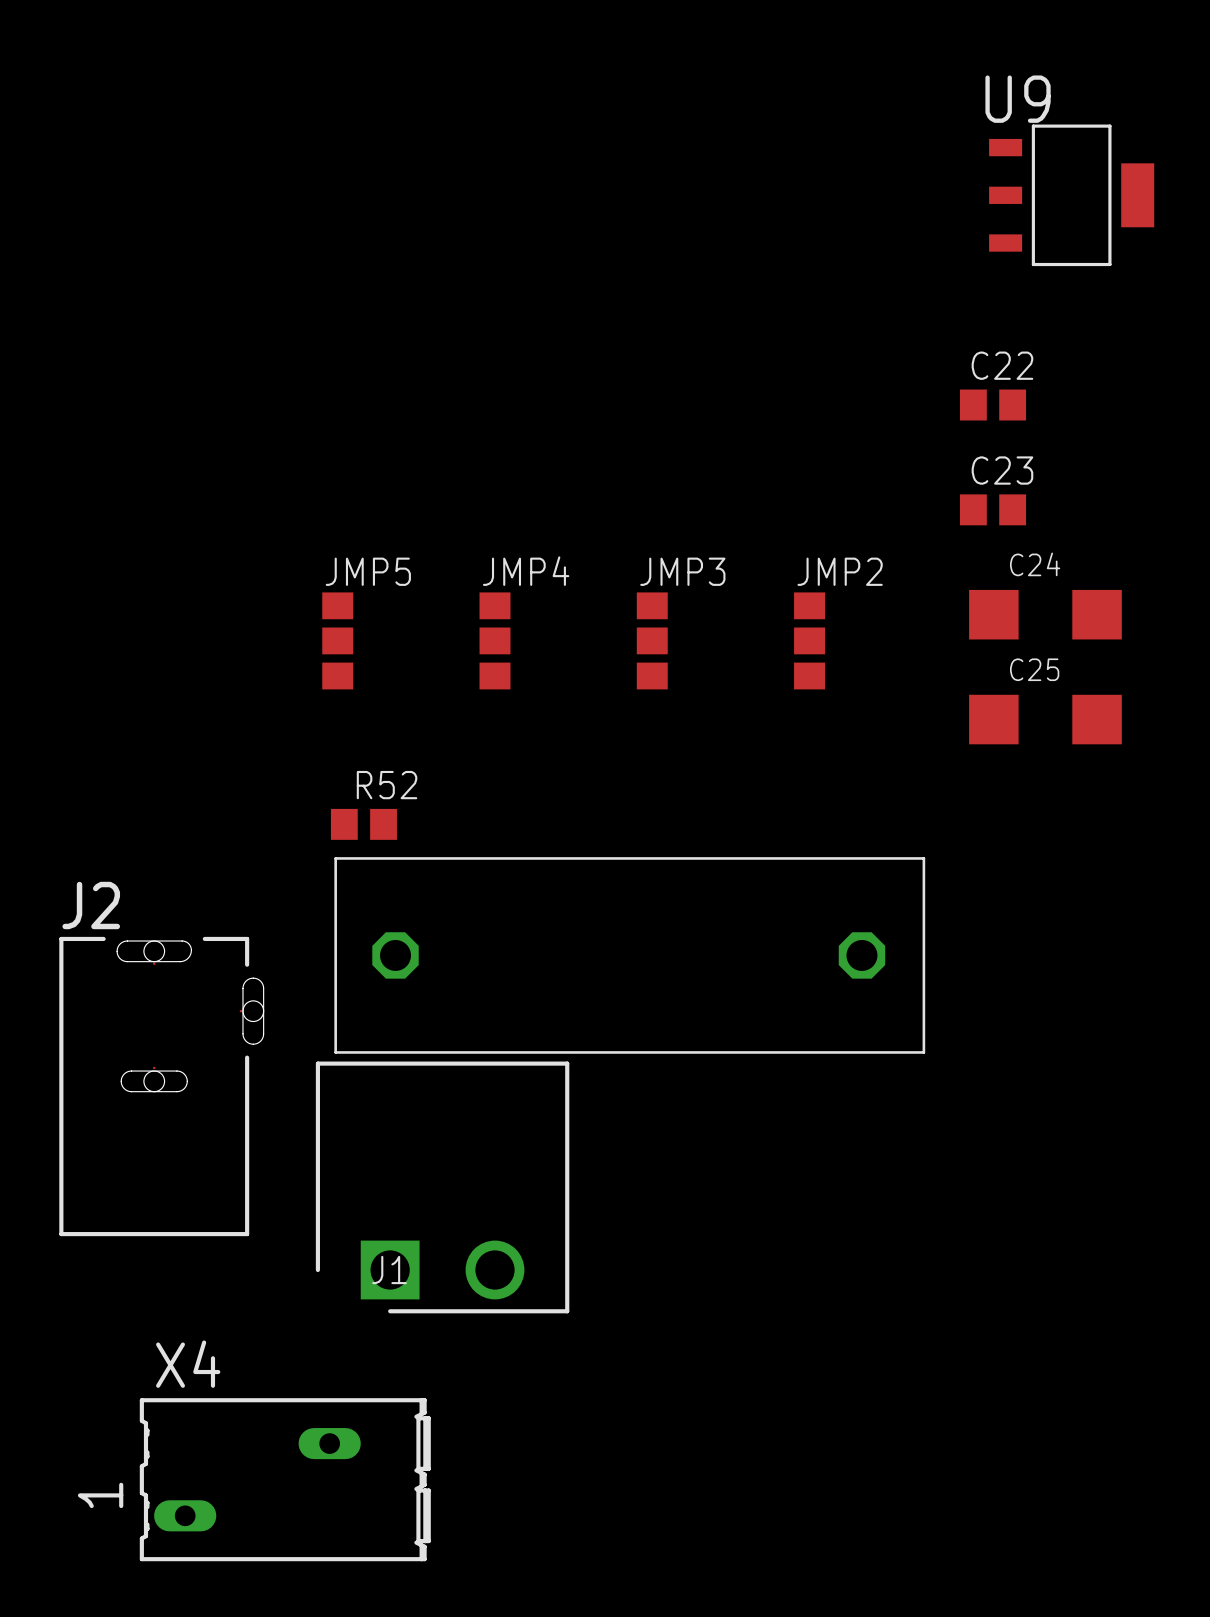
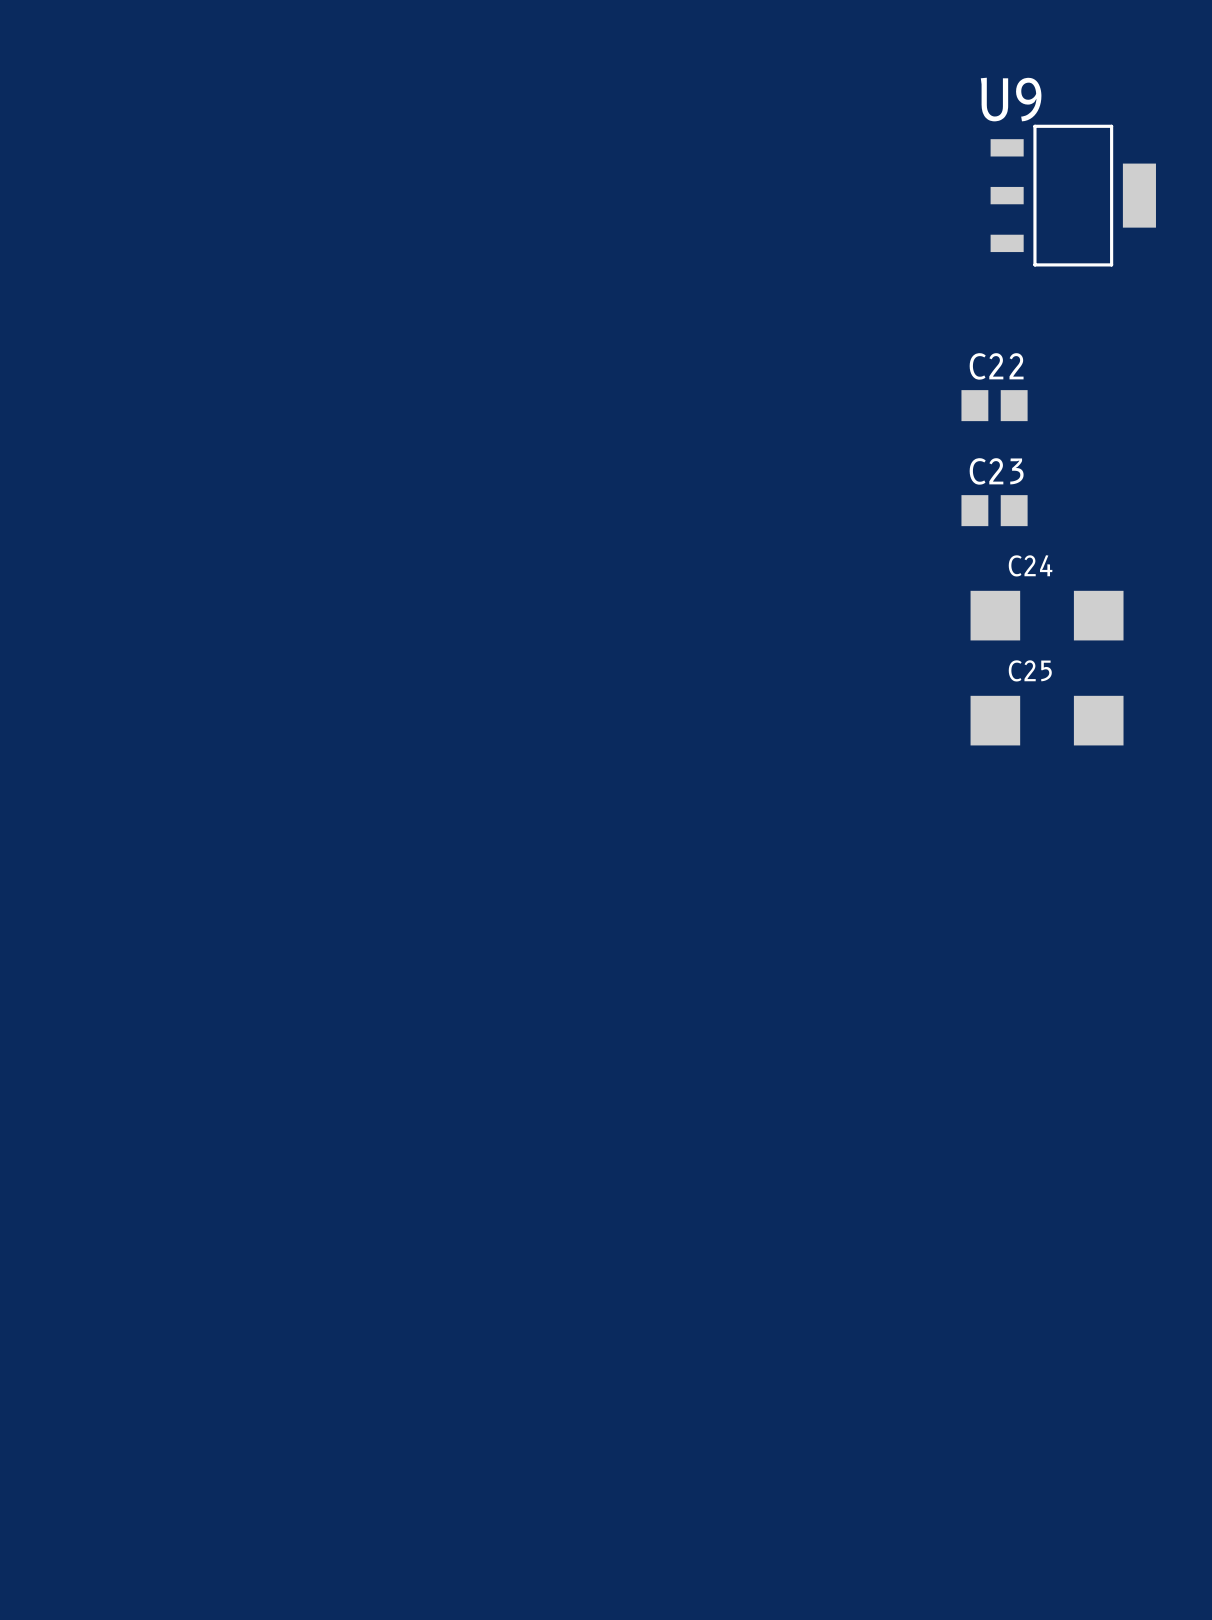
JMP5: (337, 640) -> none
JMP4: (495, 640) -> none
JMP3: (652, 640) -> none
JMP2: (809, 640) -> none
R52: (363, 824) -> none
part: (629, 955) -> none
J2: (161, 1086) -> none
J1: (442, 1187) -> none
X4: (285, 1479) -> none

